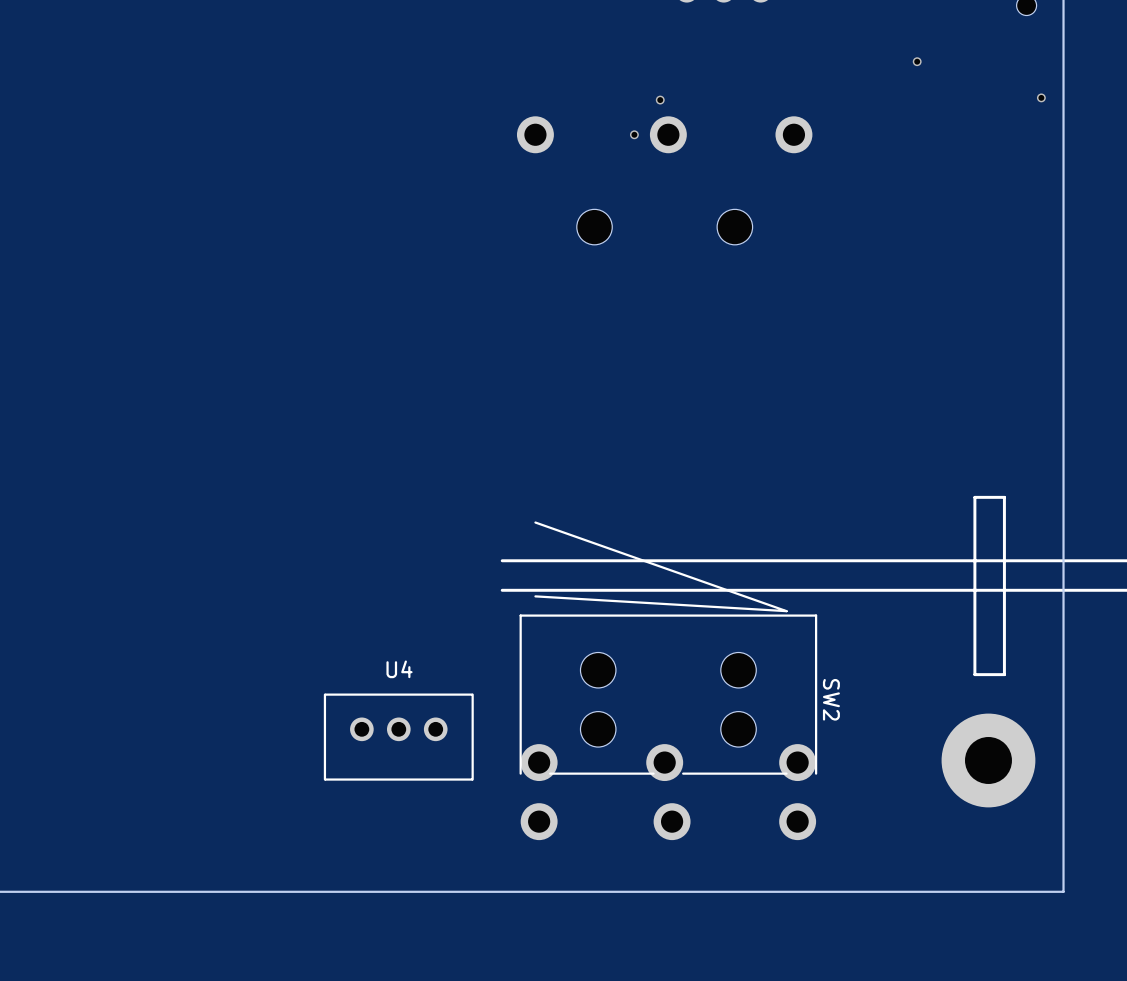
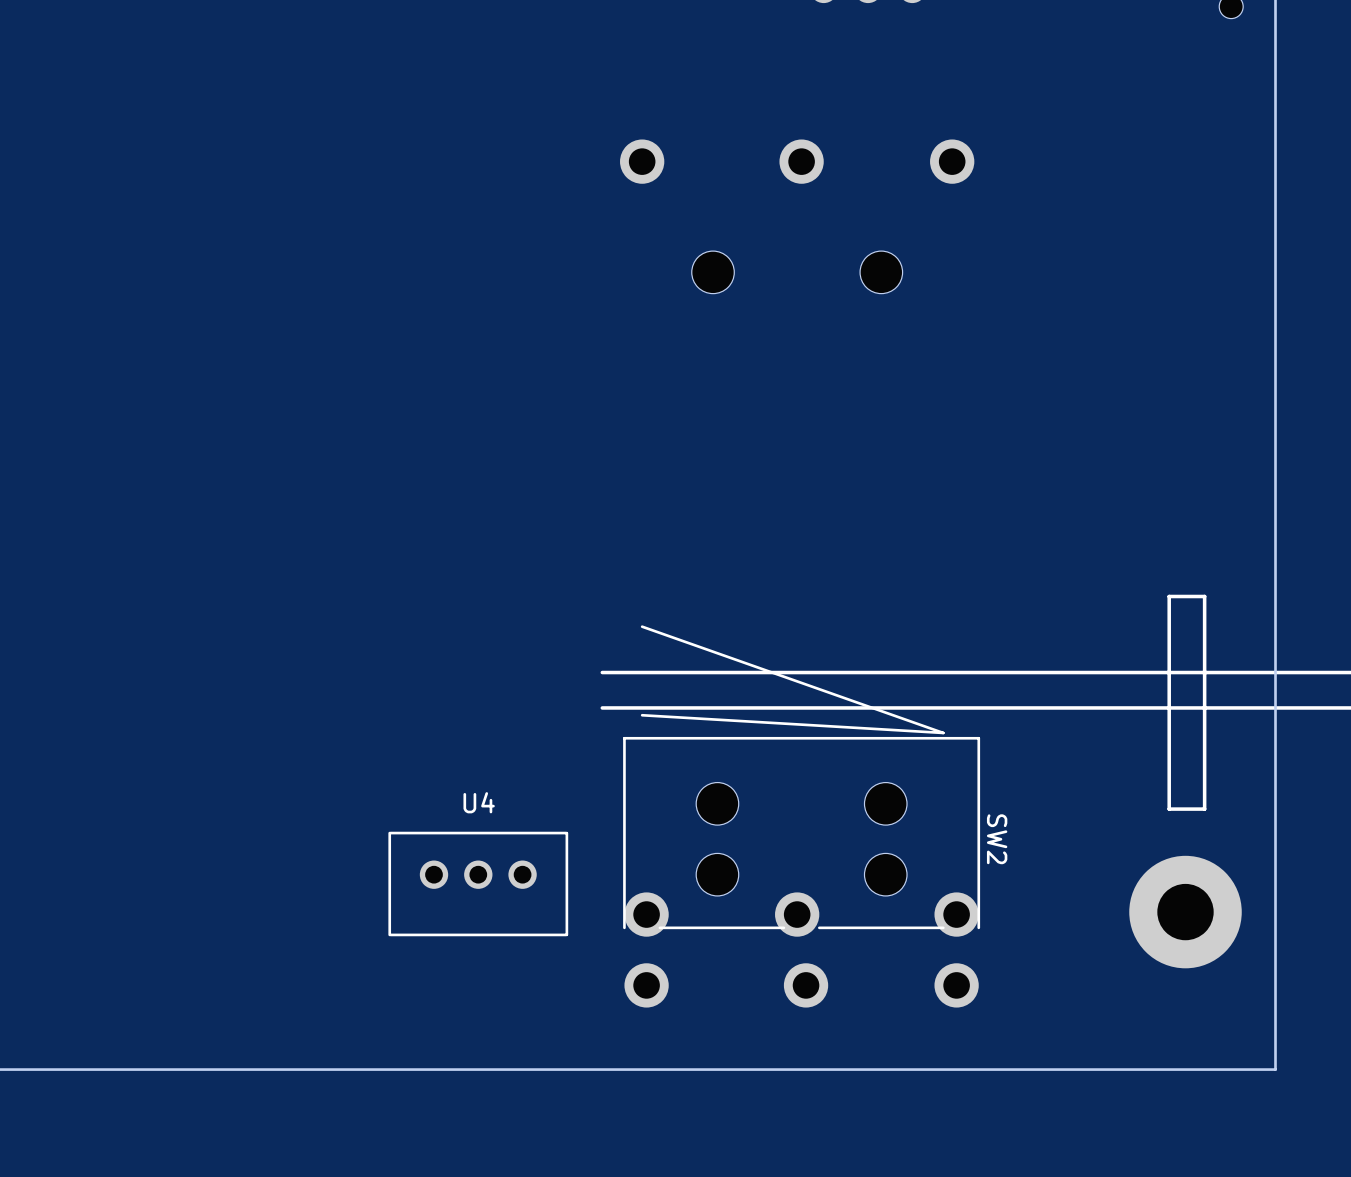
via: (917, 61) -> none
via: (1041, 97) -> none
via: (660, 100) -> none
via: (634, 134) -> none

